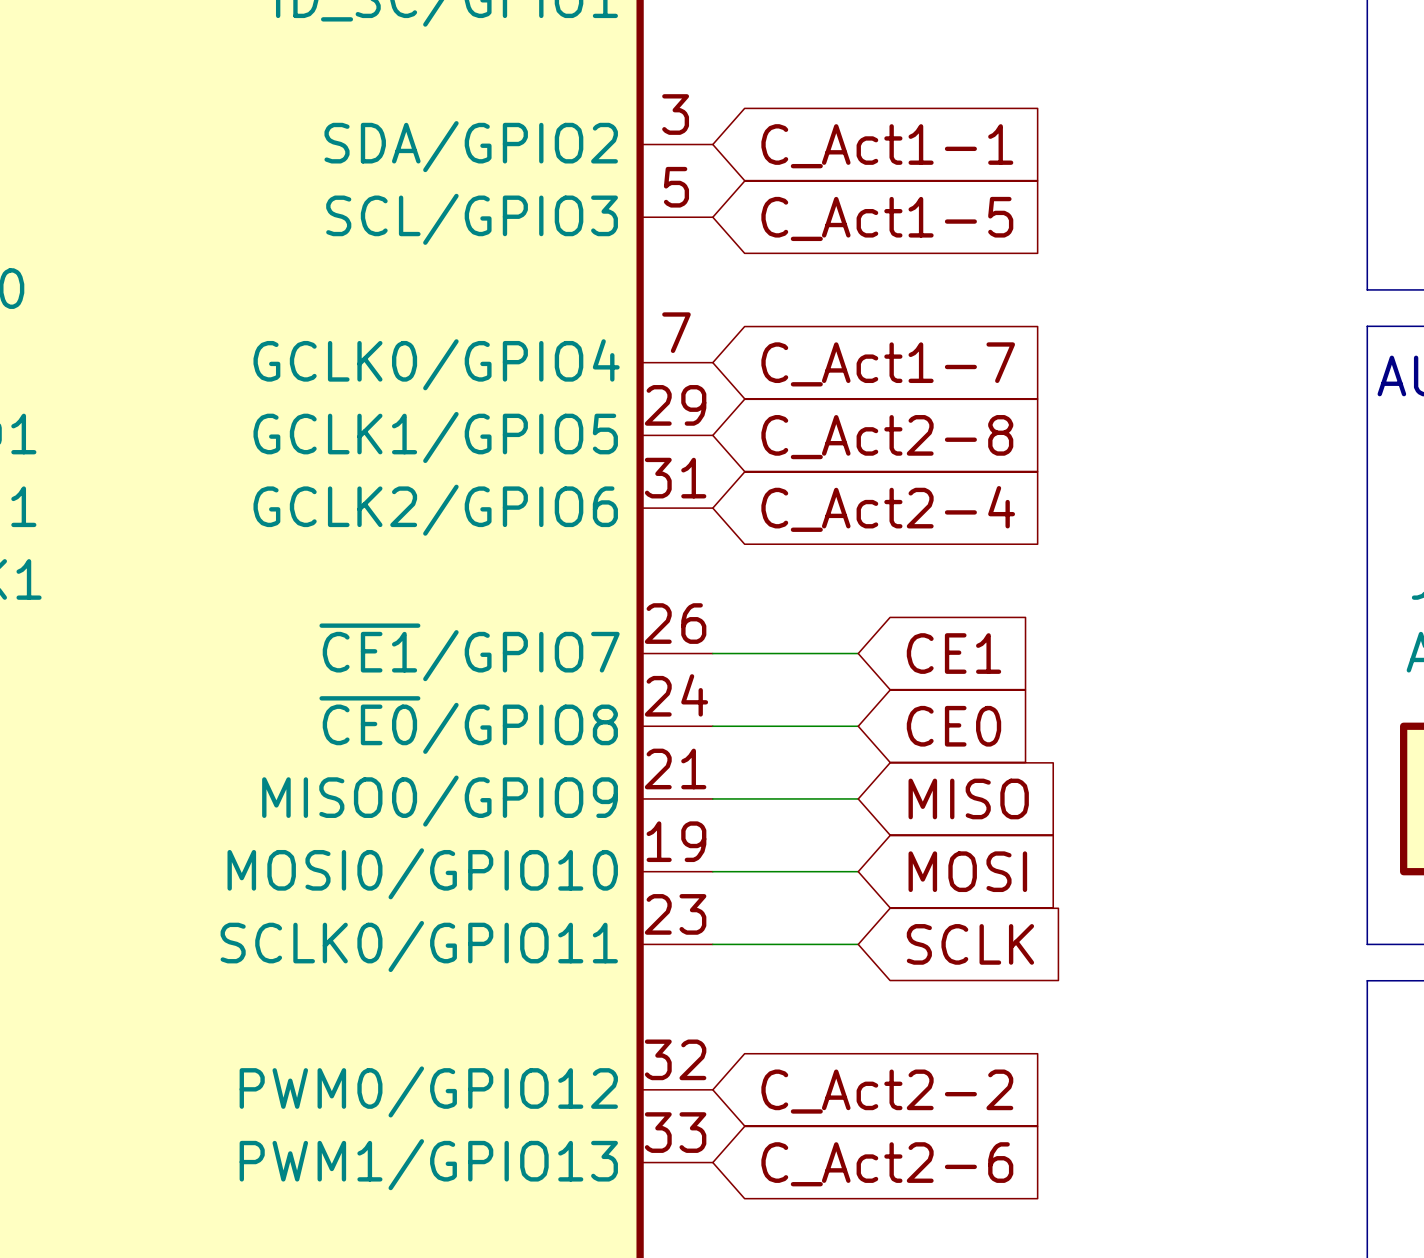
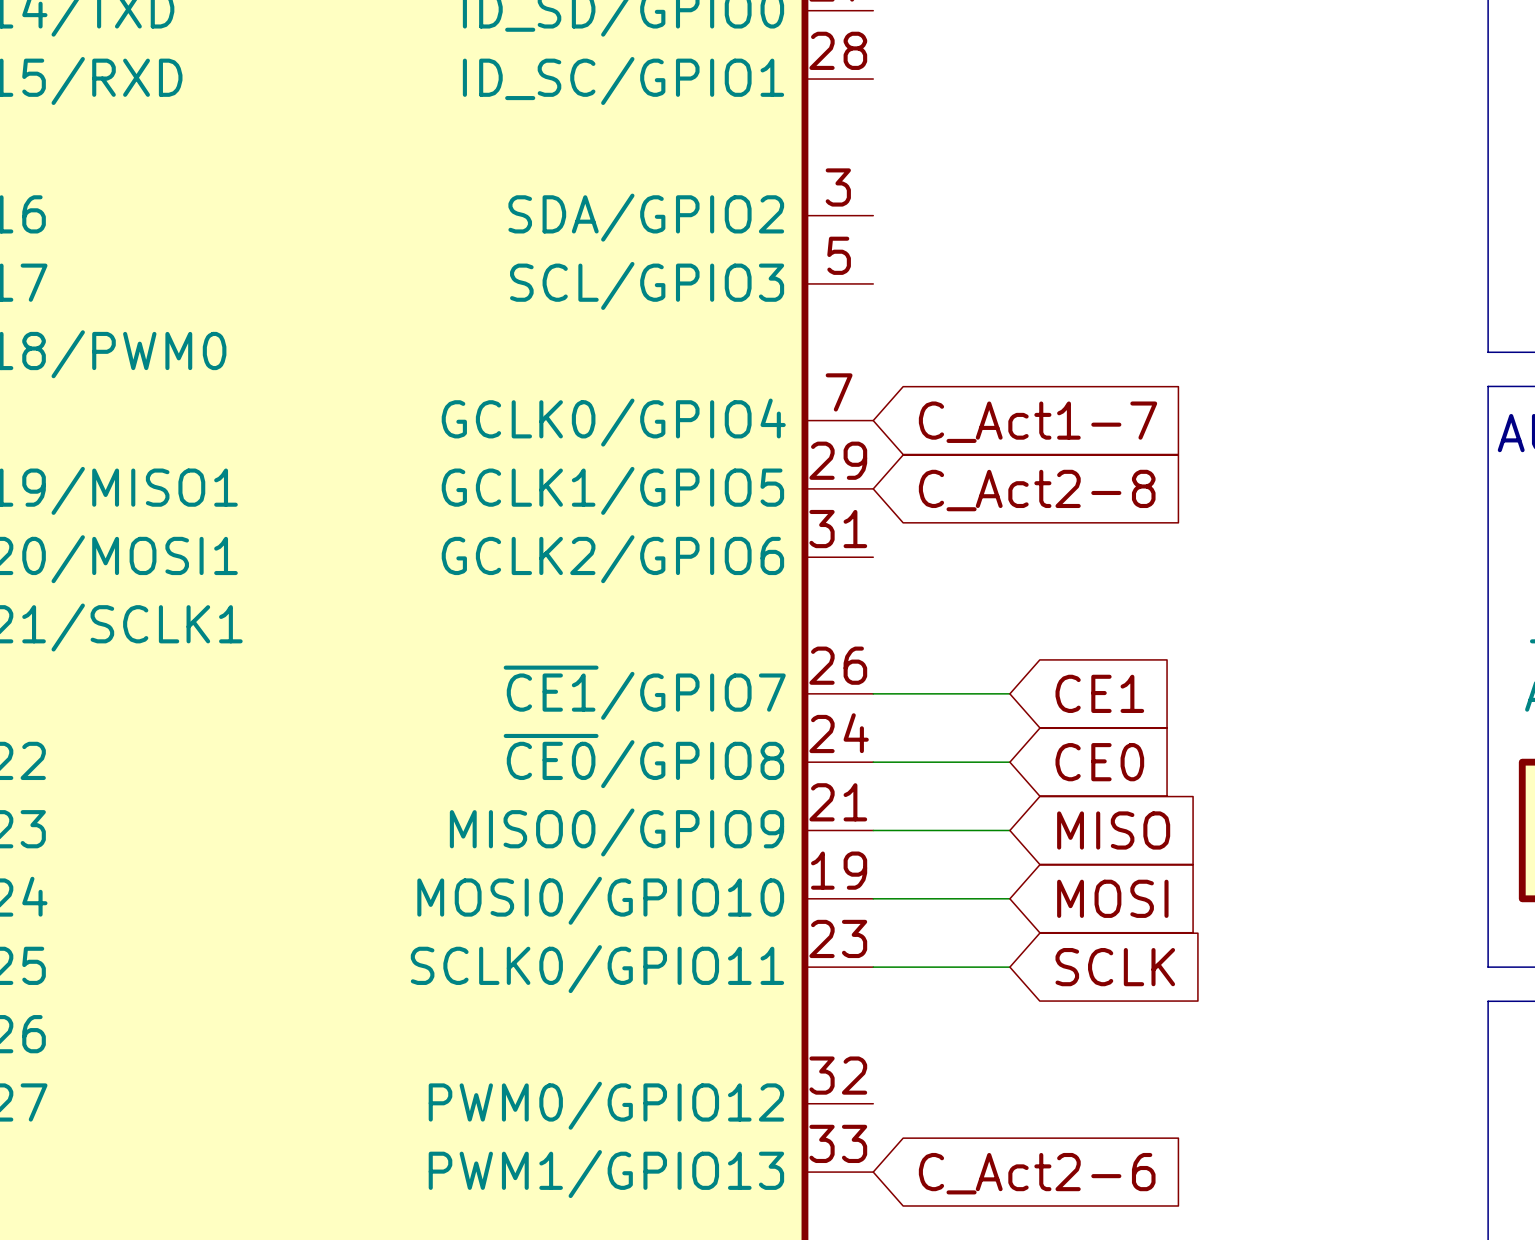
global label: C_Act1-1 (887, 146) -> none
global label: C_Act1-5 (887, 218) -> none
global label: C_Act2-4 (888, 508) -> none
global label: C_Act2-2 (887, 1091) -> none

